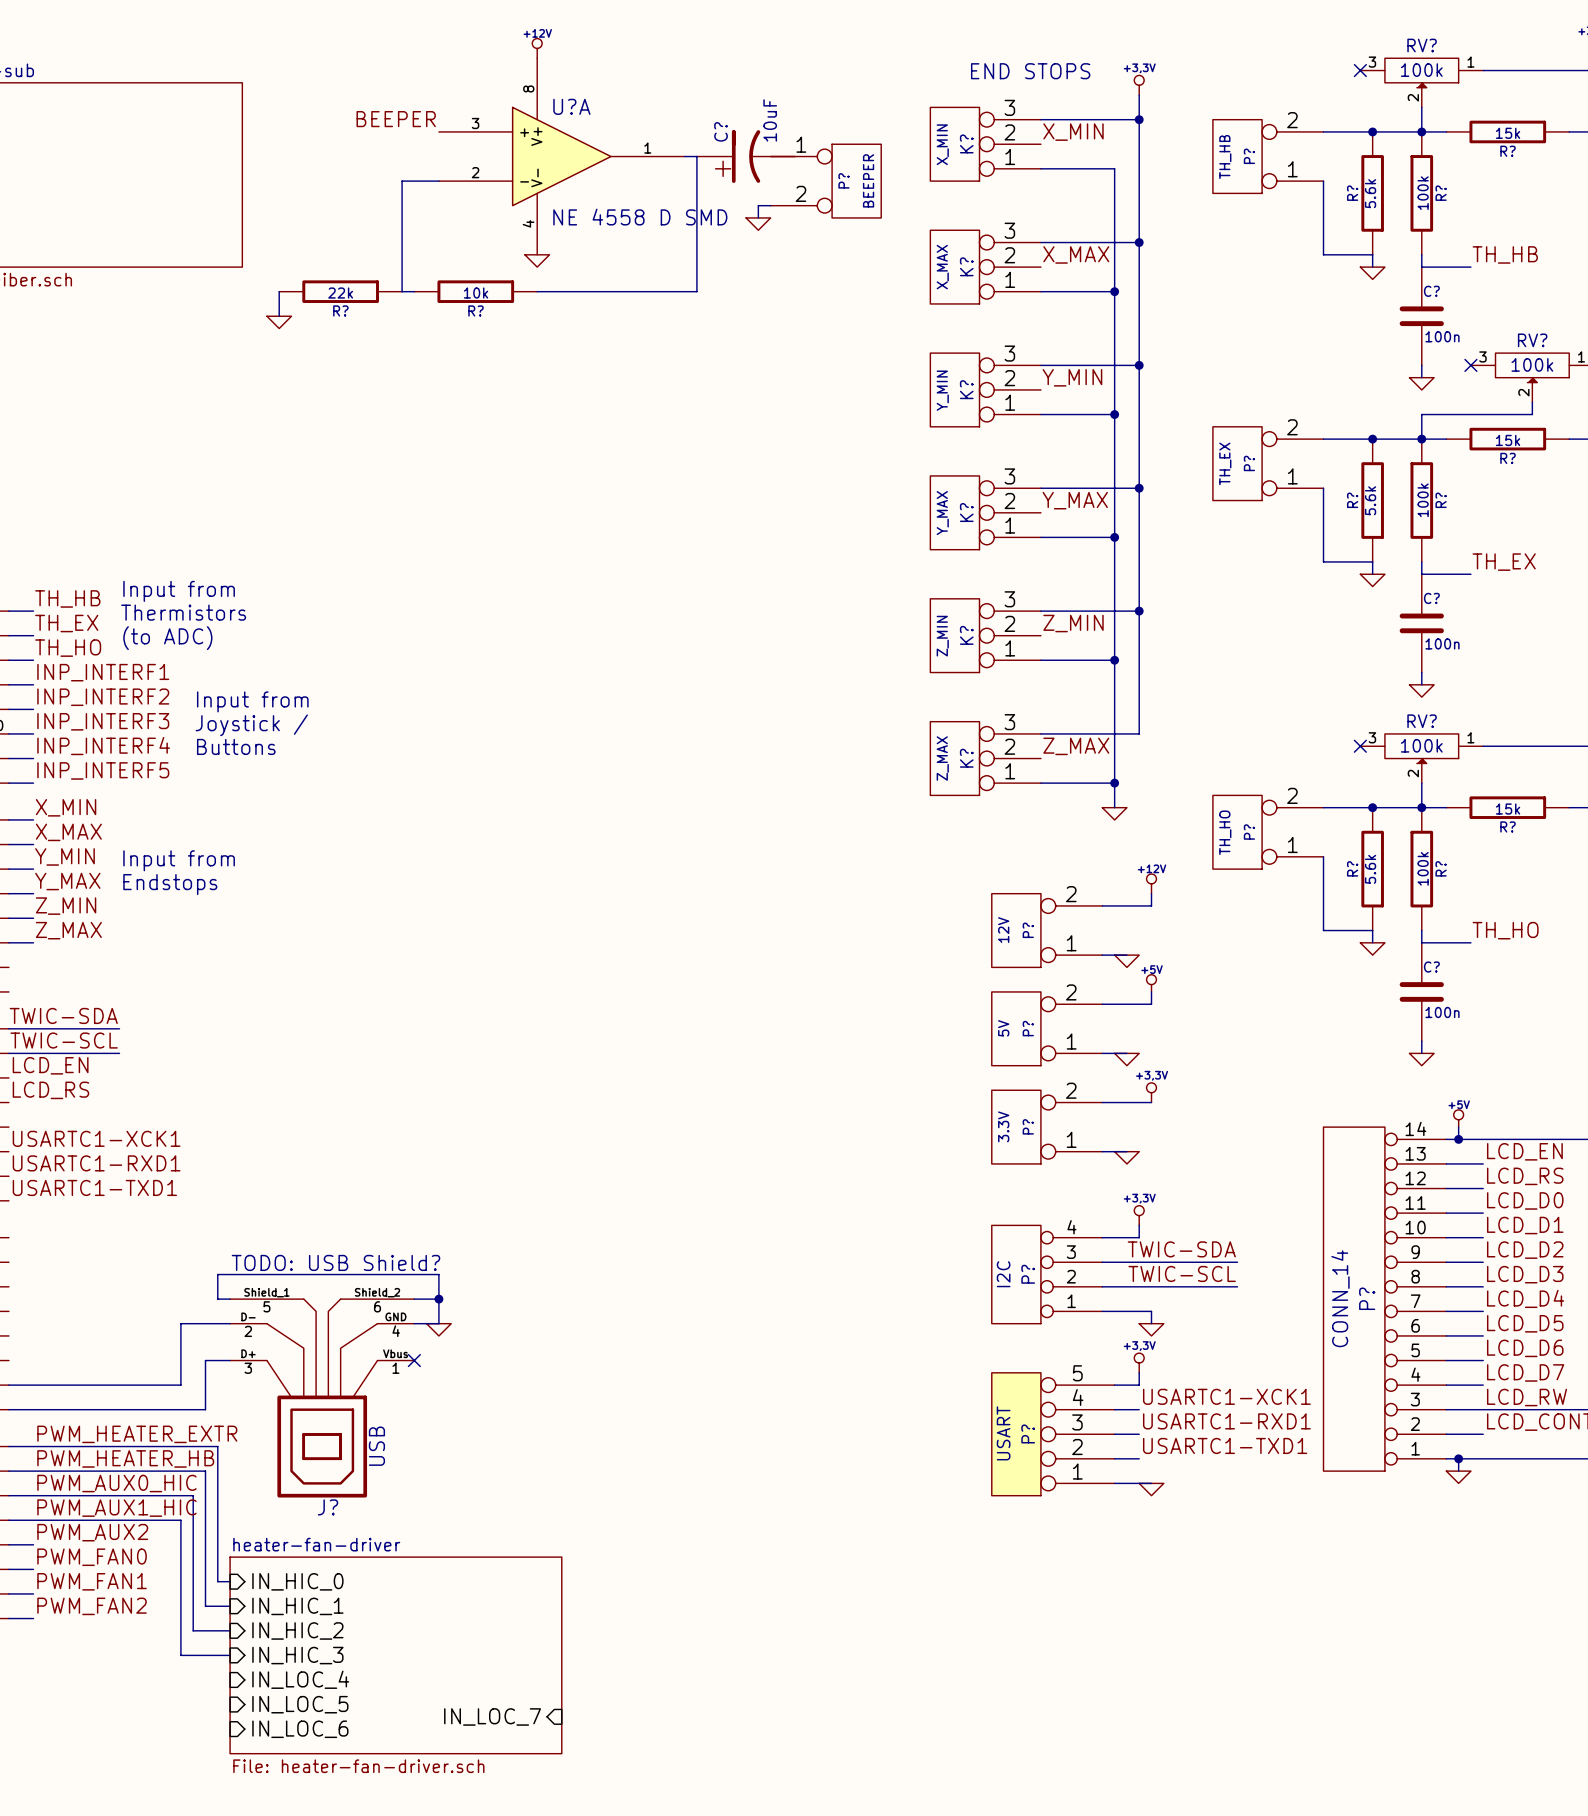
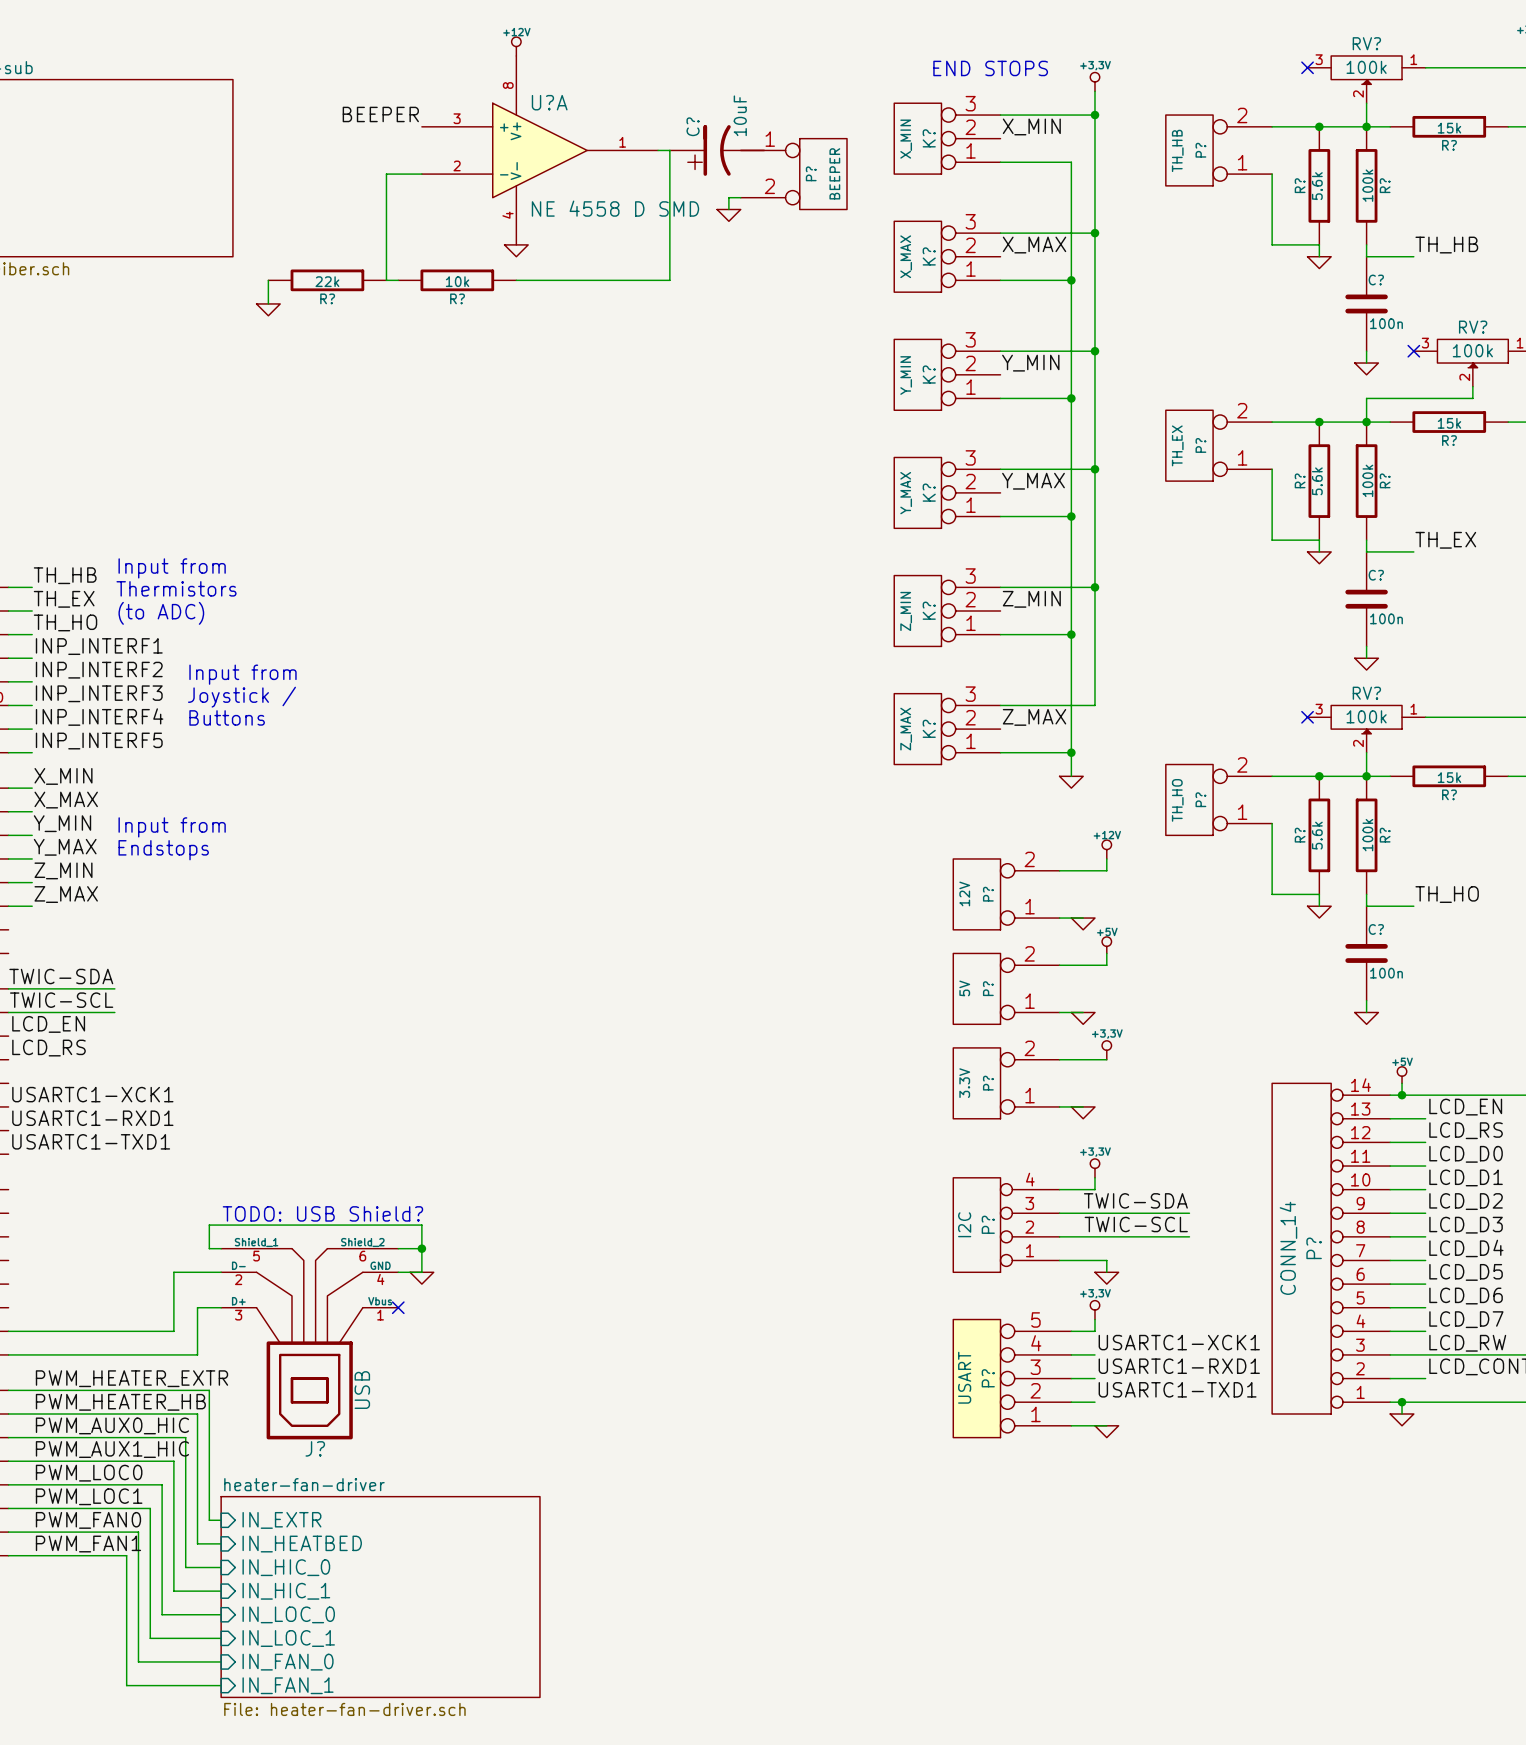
label: PWM_AUX2 (92, 1532) -> PWM_LOC0 (89, 1473)
wire: none -> (32, 1484) (162, 1484) (162, 1614) (221, 1614)
label: PWM_FAN0 (92, 1557) -> PWM_LOC1 (89, 1496)
sheet heater-fan-driver shape: [230, 1557, 562, 1754] -> [221, 1496, 540, 1698]
wire: none -> (32, 1508) (150, 1508) (150, 1638) (221, 1638)
label: PWM_FAN1 (92, 1581) -> PWM_FAN0 (88, 1520)
sheet pin: IN_HIC_0 (297, 1581) -> IN_EXTR (281, 1520)
wire: none -> (32, 1532) (138, 1532) (138, 1661) (221, 1661)
label: PWM_FAN2 (92, 1606) -> PWM_FAN1 (88, 1544)
sheet pin: IN_HIC_1 (297, 1606) -> IN_HEATBED (302, 1544)
wire: none -> (32, 1555) (126, 1555) (126, 1685) (221, 1685)
sheet pin: IN_HIC_2 (297, 1630) -> IN_HIC_0 (286, 1567)
sheet pin: IN_HIC_3 (297, 1655) -> IN_HIC_1 (286, 1591)
sheet pin: IN_LOC_4 (300, 1679) -> IN_LOC_0 (288, 1614)
sheet pin: IN_LOC_5 (300, 1704) -> IN_LOC_1 (288, 1638)
sheet pin: IN_LOC_7 (492, 1716) -> none
sheet pin: IN_LOC_6 (300, 1729) -> IN_FAN_0 (288, 1662)
sheet pin: none -> IN_FAN_1 (288, 1685)

